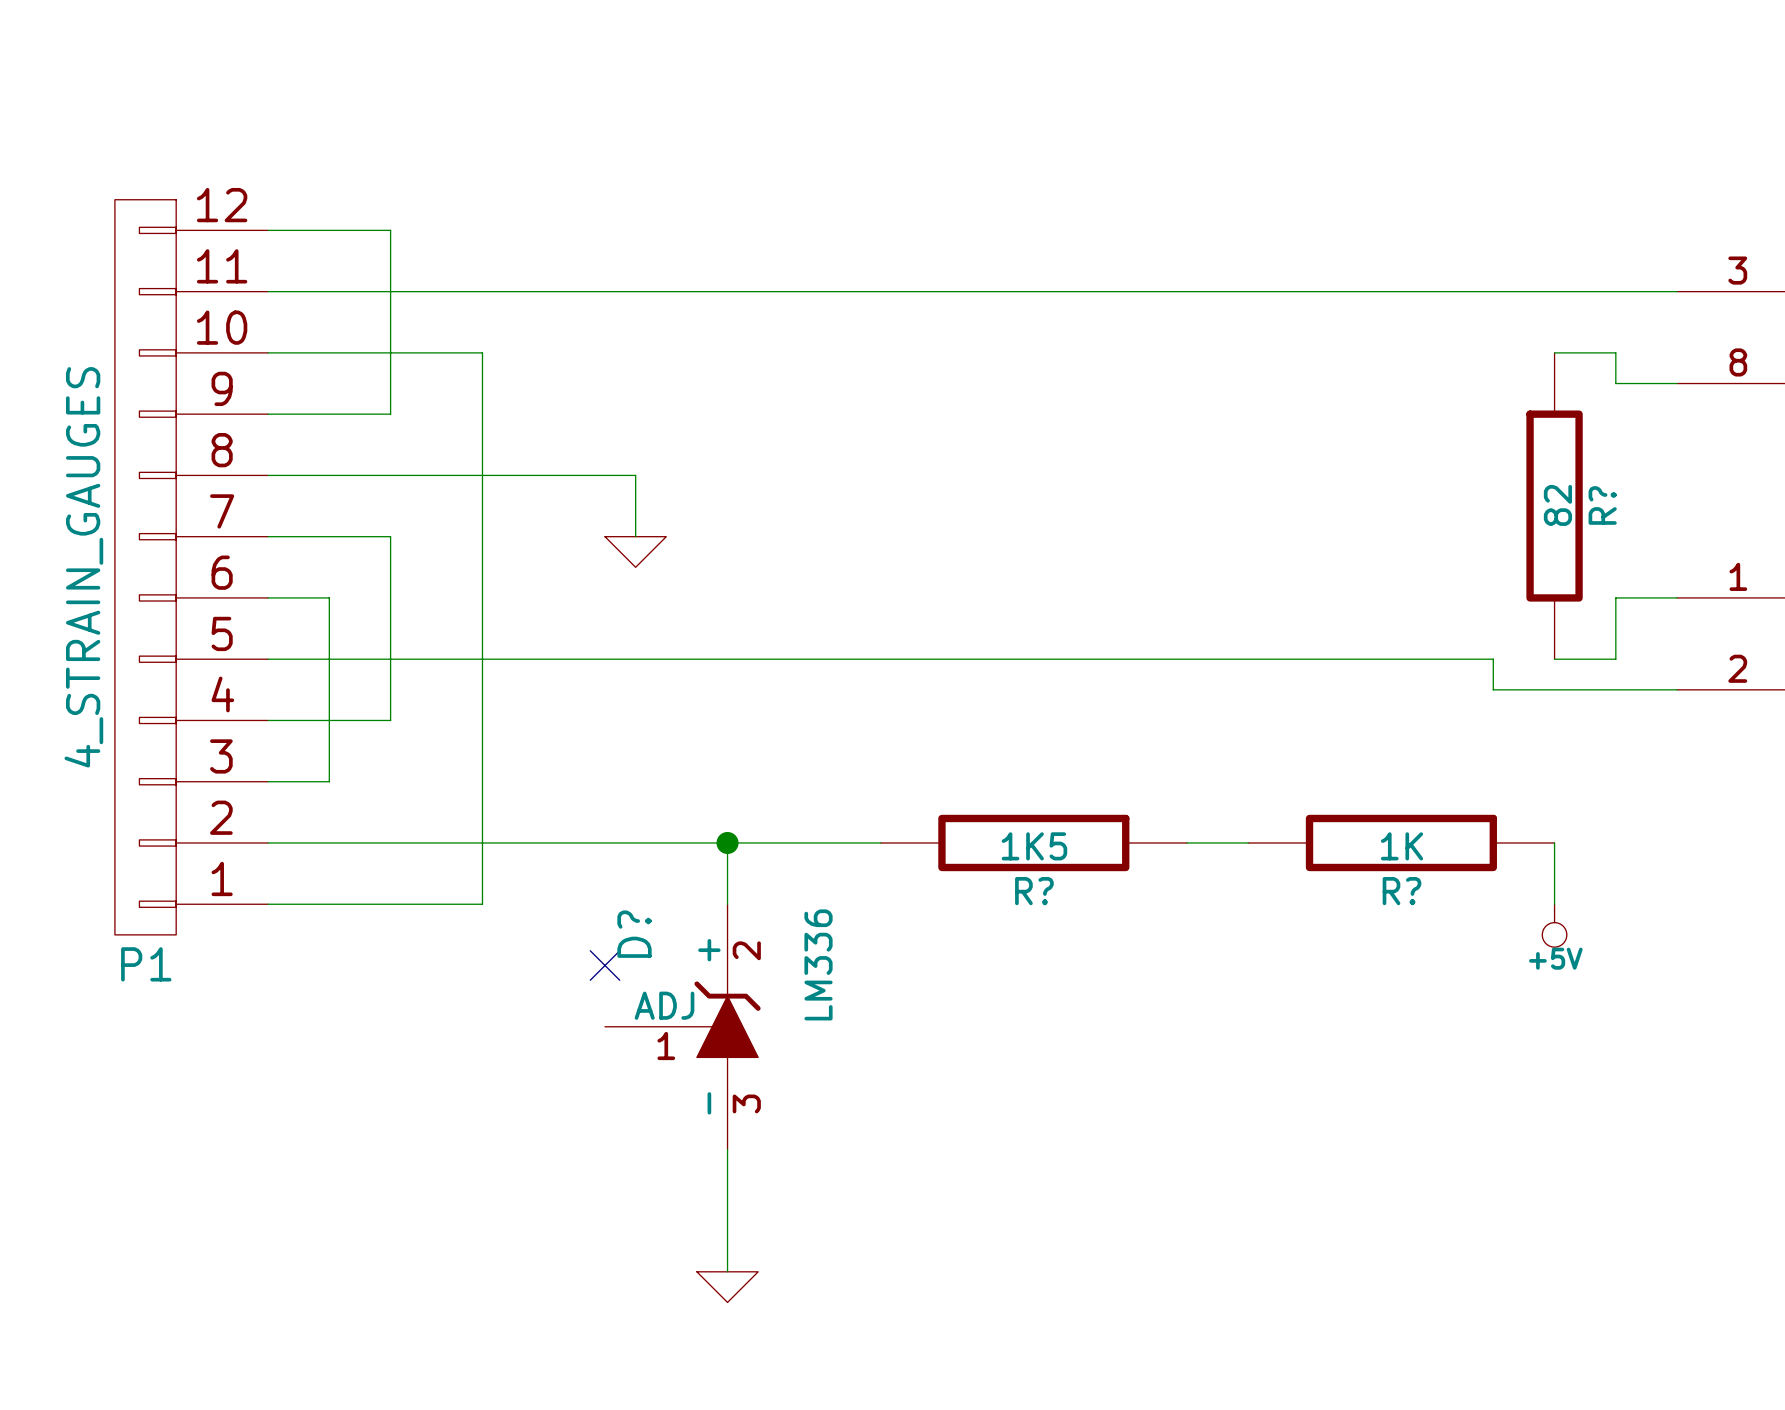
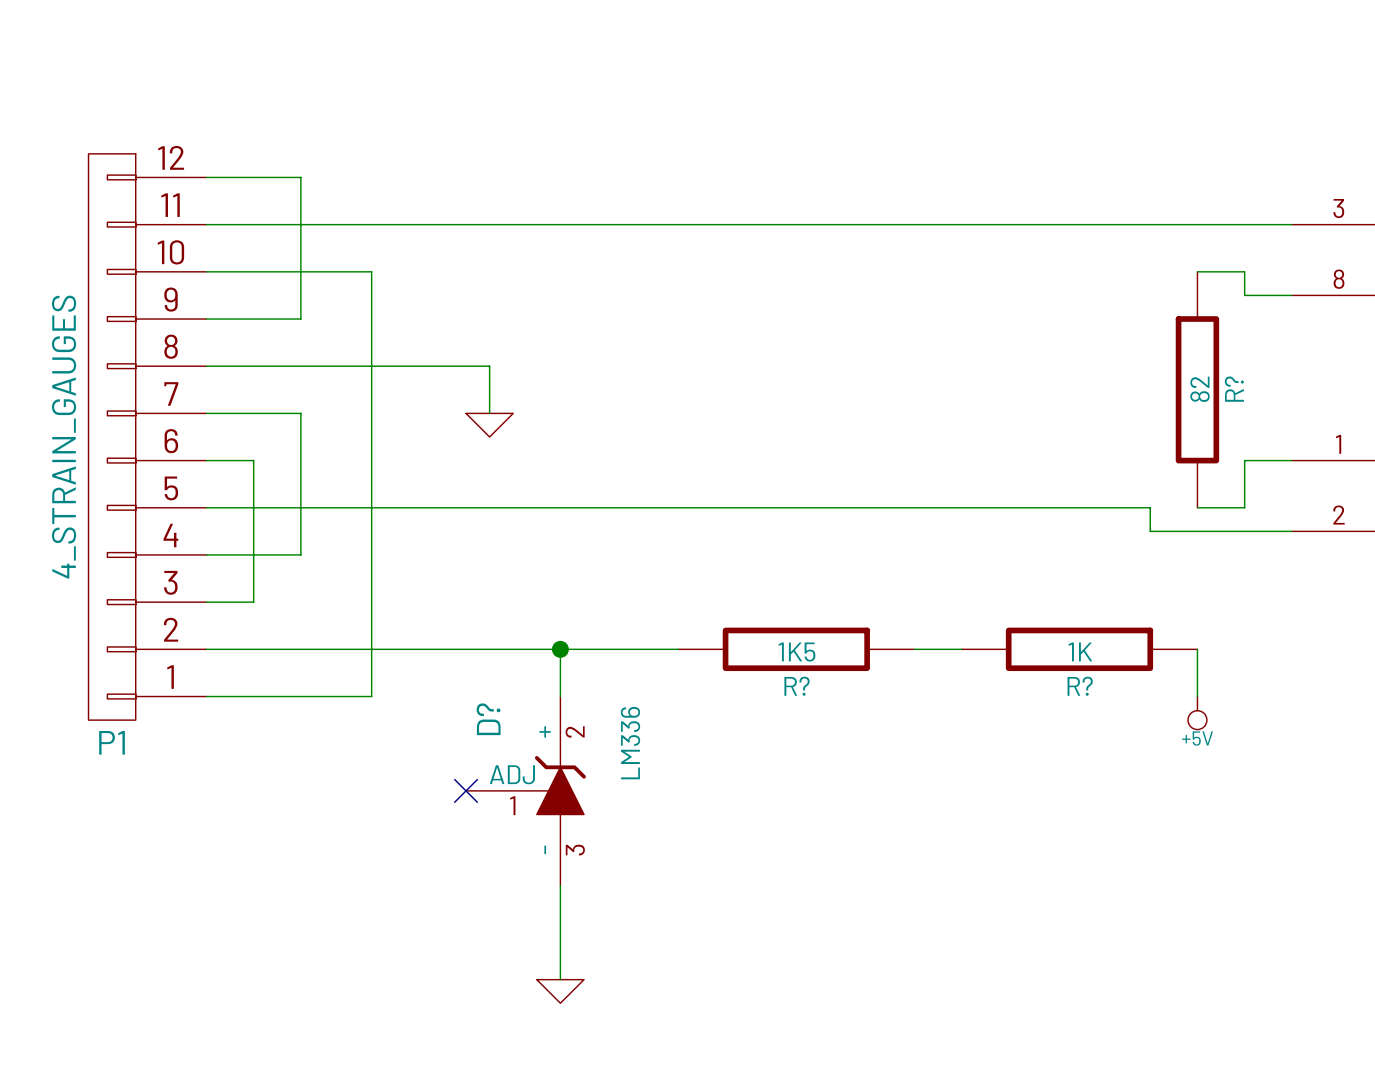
no-connect mark position: (605, 965) -> (466, 790)

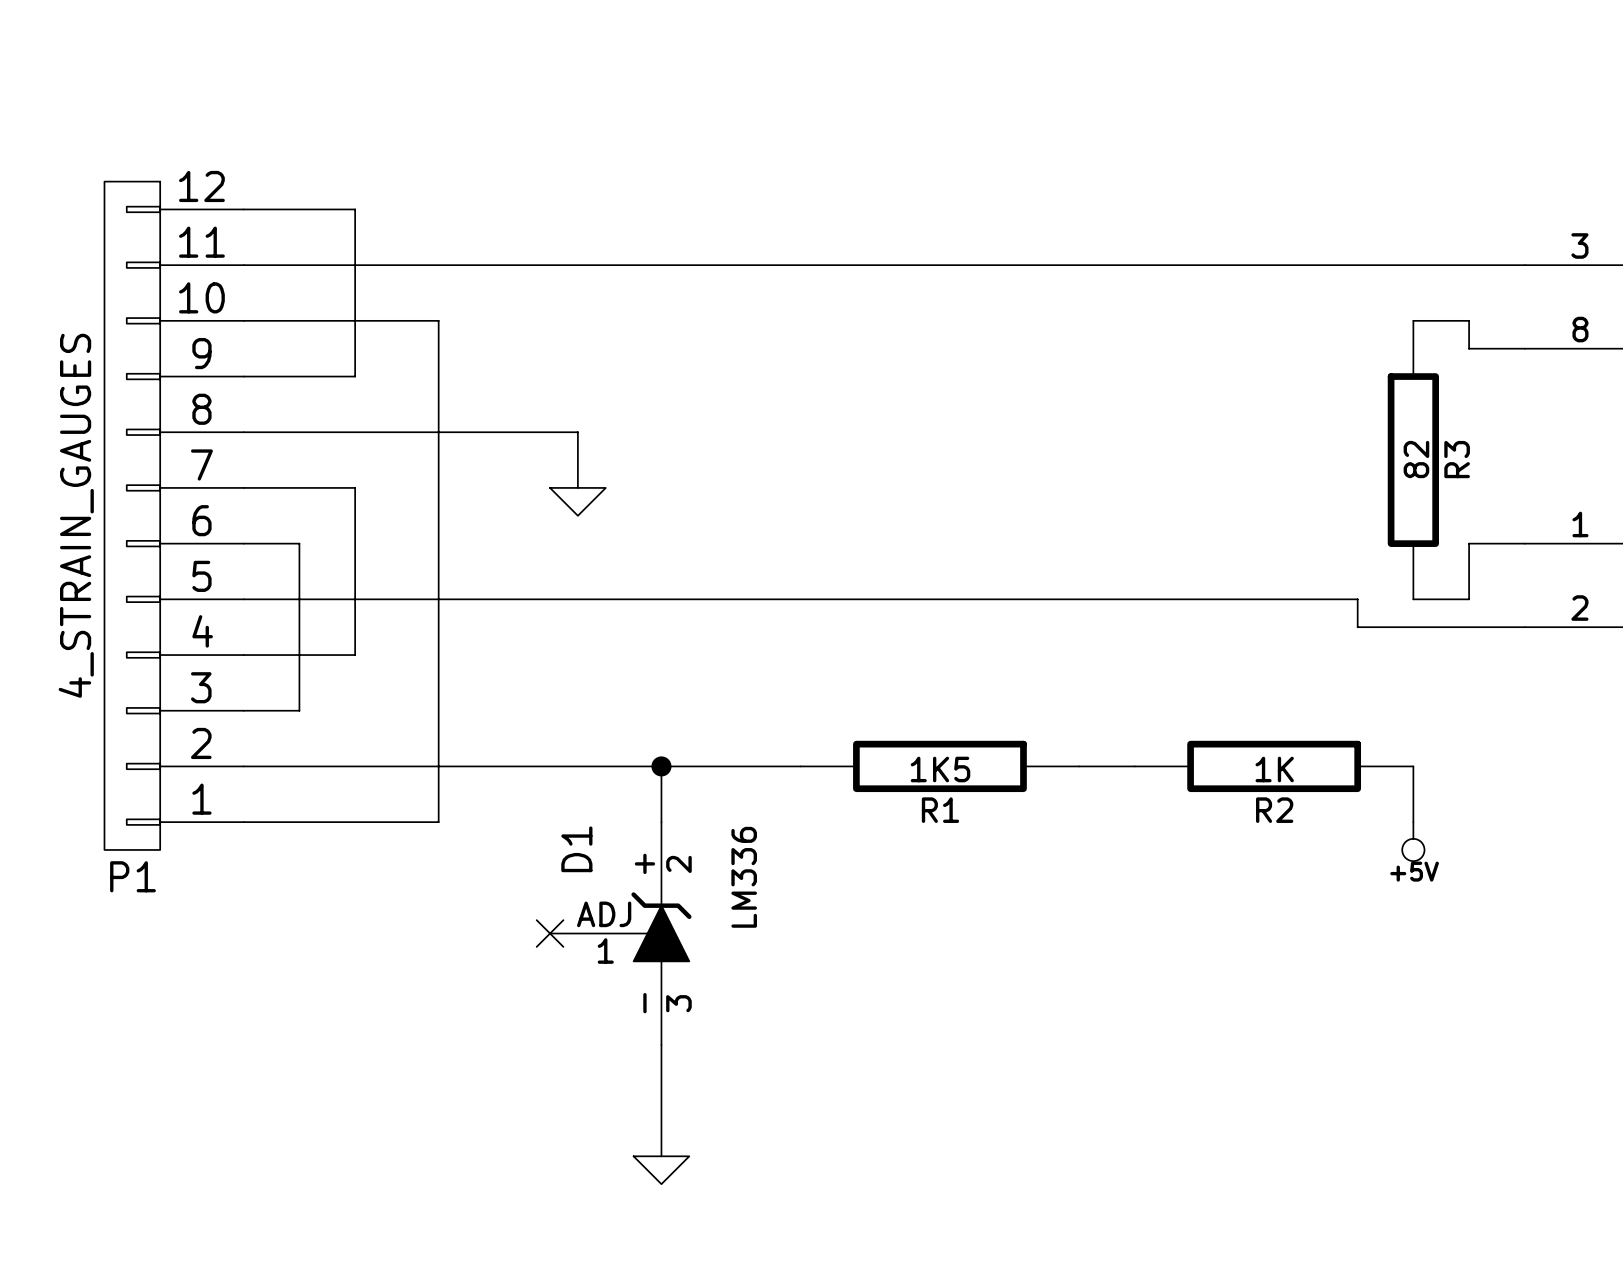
R? name: R? (1234, 389) -> R3 (1457, 459)
R? name: R? (797, 686) -> R1 (940, 810)
R? name: R? (1080, 686) -> R2 (1274, 810)
D? name: D? (488, 719) -> D1 (576, 849)

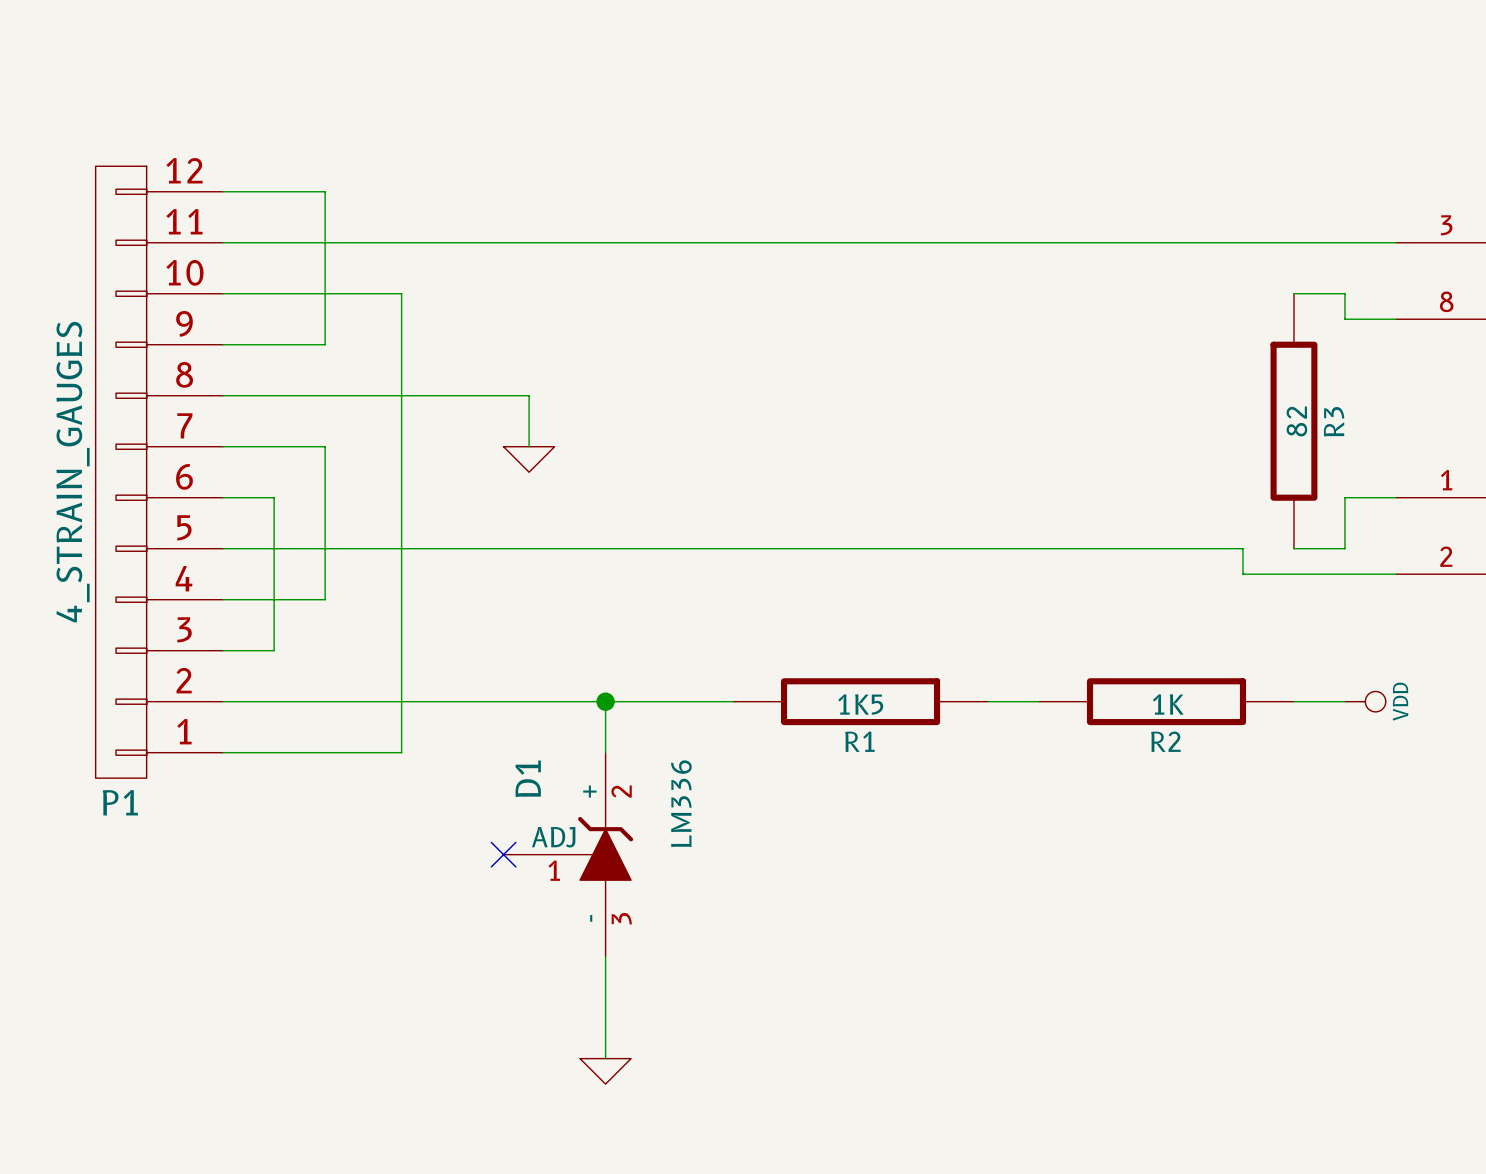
wire: (1413, 766) (1413, 822) -> (1293, 701) (1344, 701)
power symbol: none -> VDD (1365, 701)
power symbol: +5V (1413, 841) -> none

